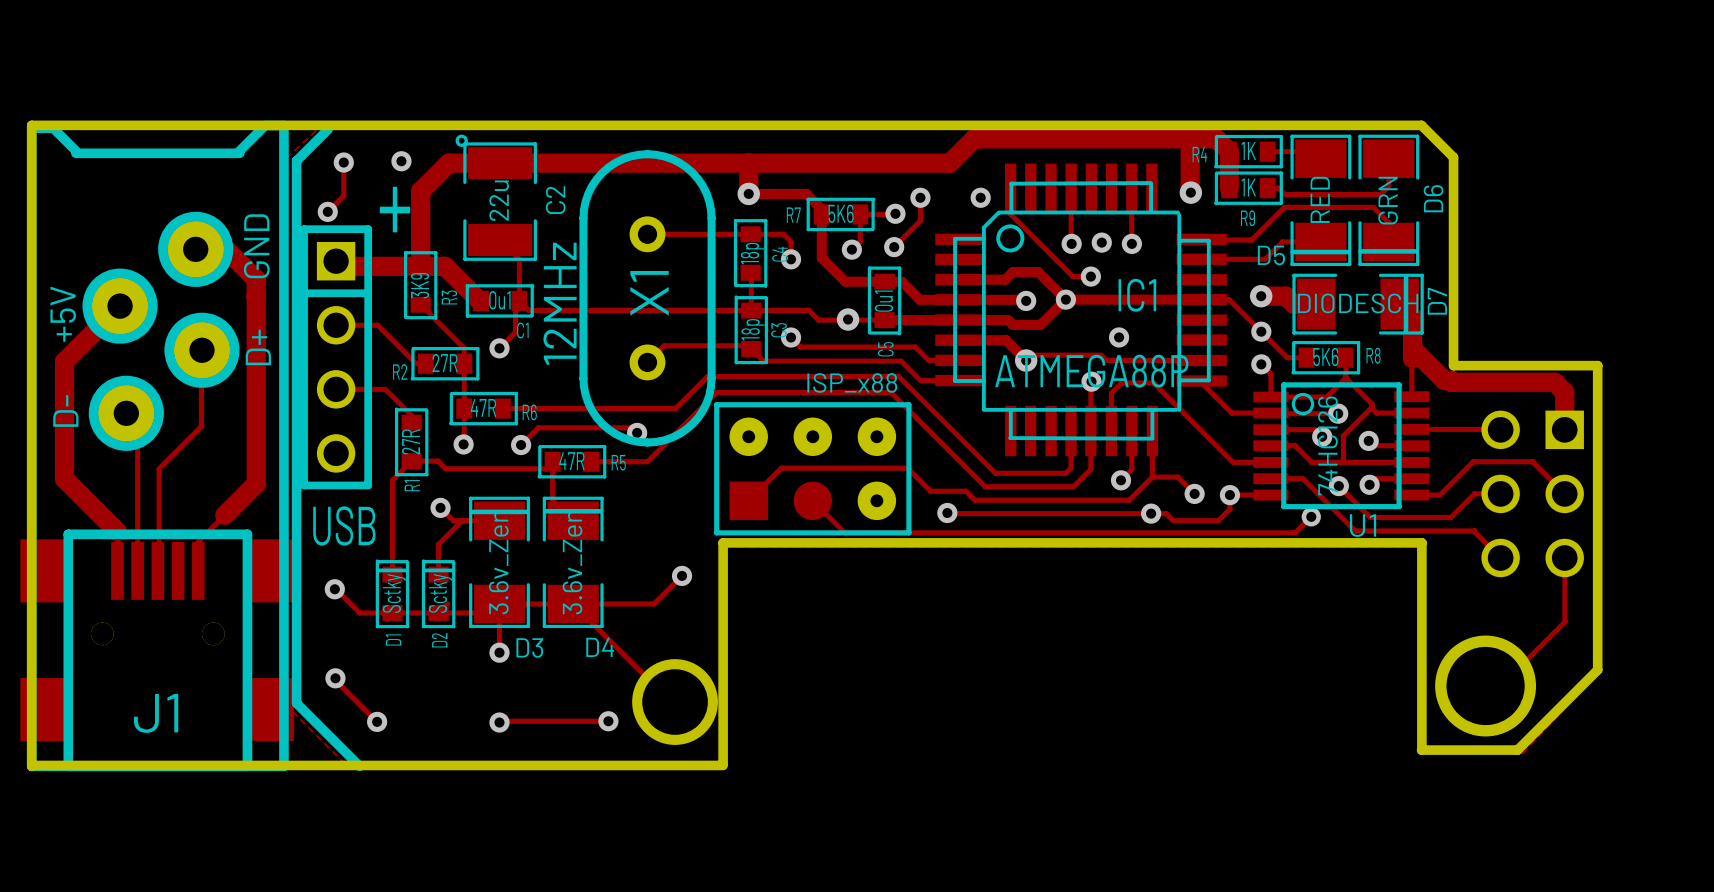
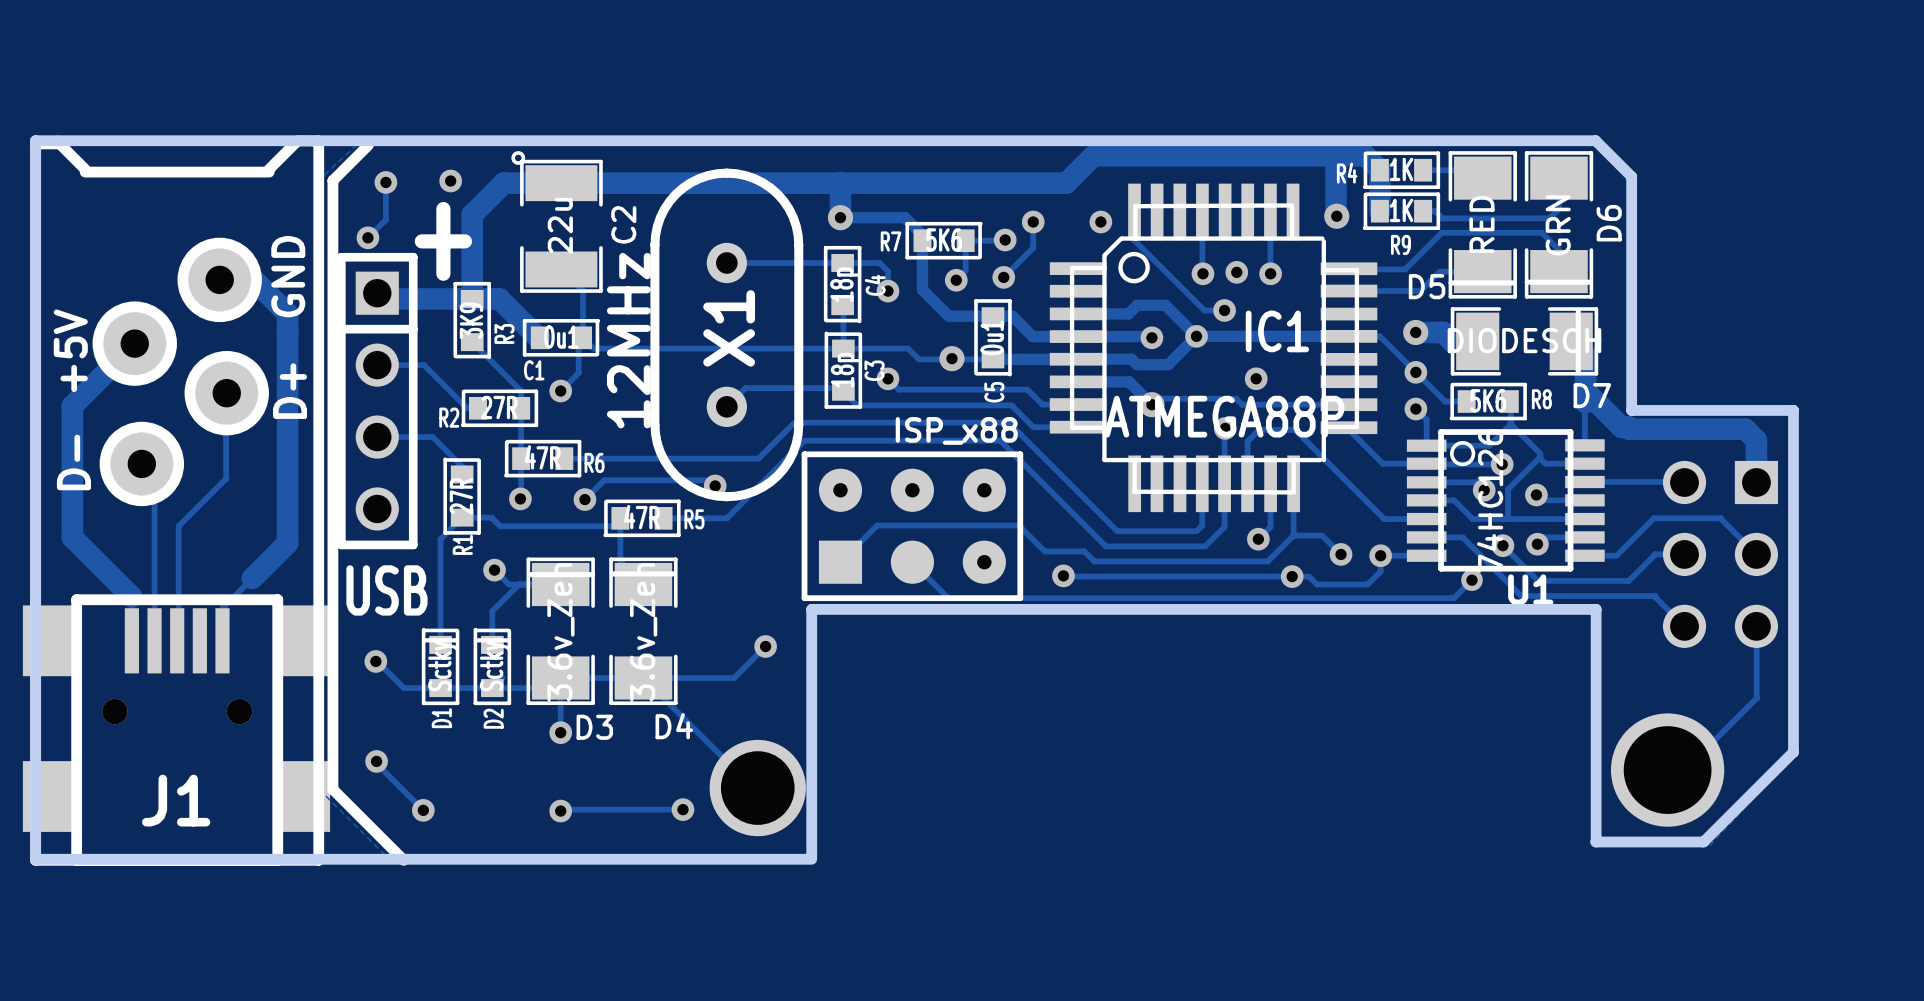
D7 name rotation: 0° (1437, 301) -> 90° clockwise (1592, 395)
D7 name position: D7 (1437, 301) -> D7 (1592, 395)
C1 name position: C1 (522, 330) -> C1 (534, 370)

